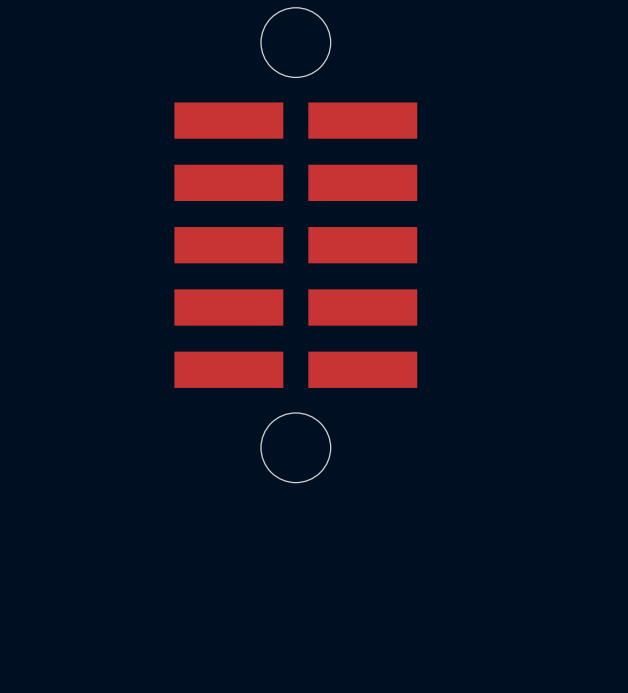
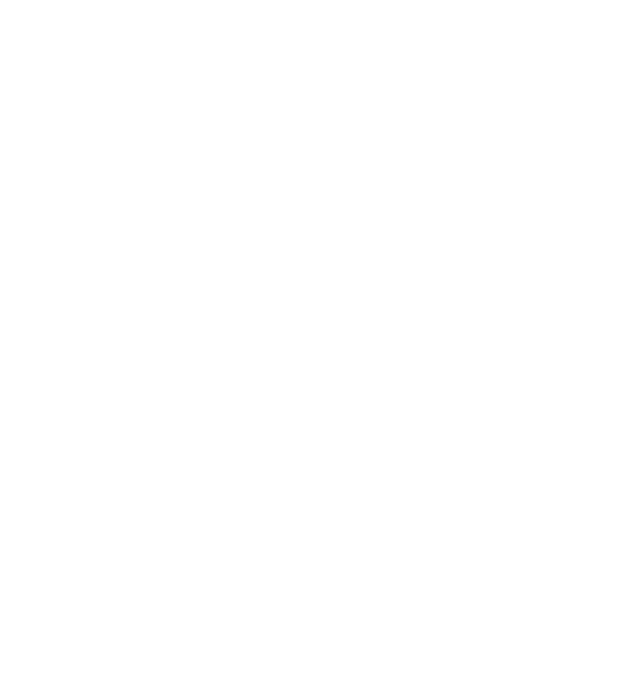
part: (295, 245) -> none

